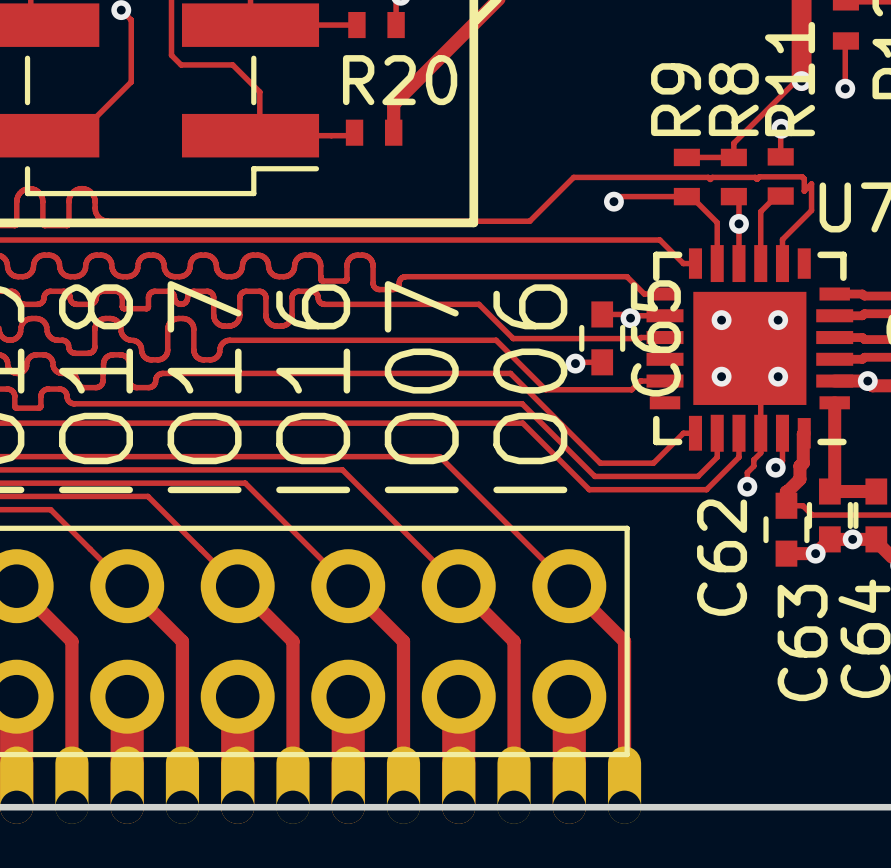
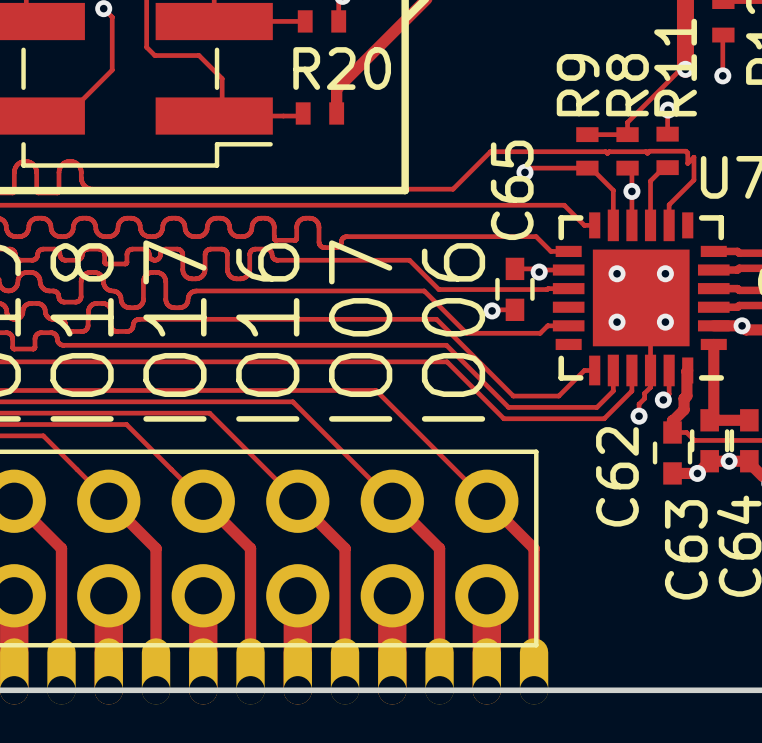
C65 name position: C65 (655, 338) -> C65 (512, 190)

